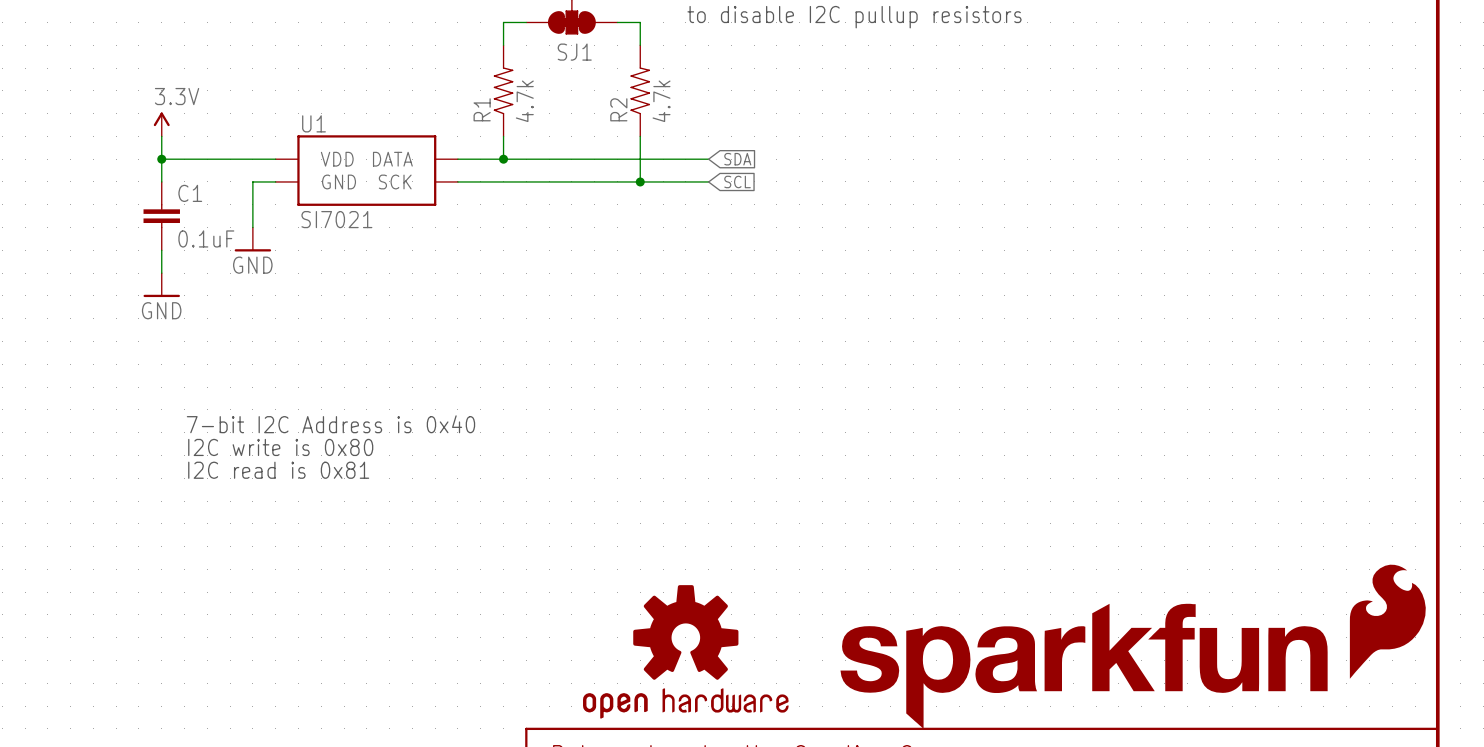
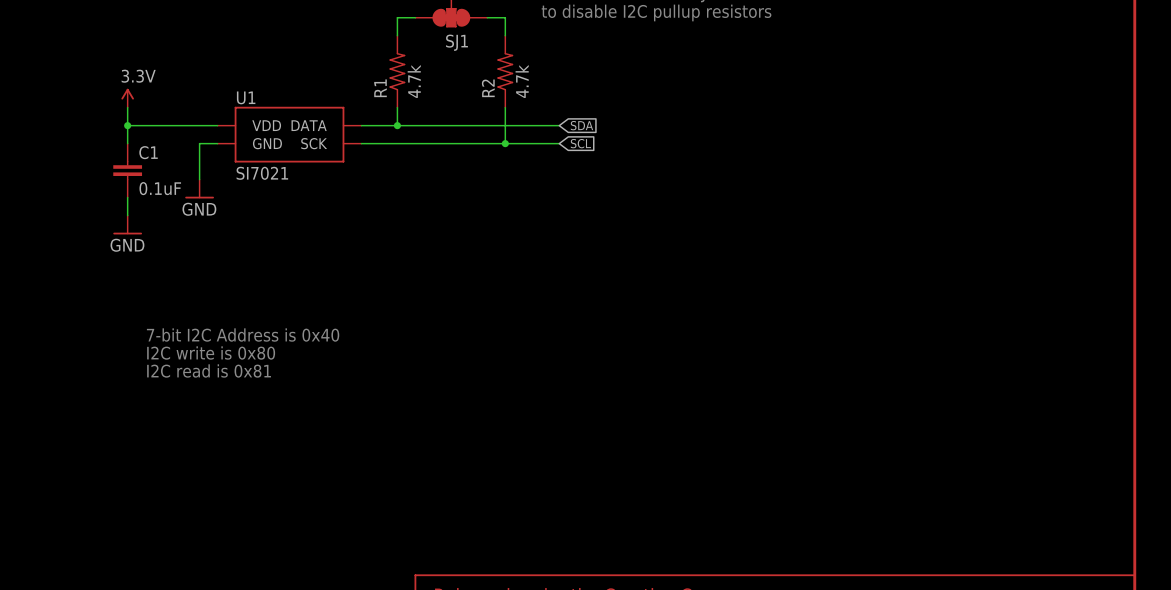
part: (1387, 621) -> none
part: (685, 651) -> none
part: (1084, 666) -> none

